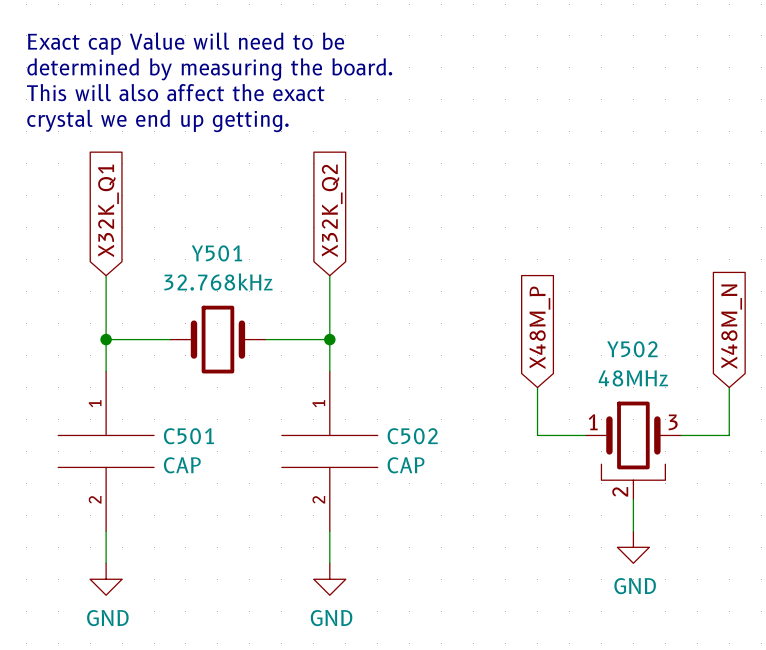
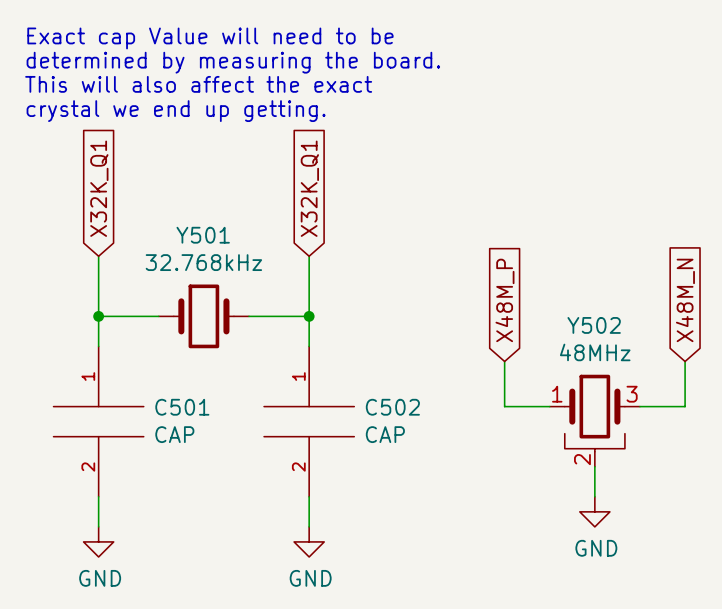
global label: X32K_Q2 (332, 210) -> X32K_Q1 (309, 188)

